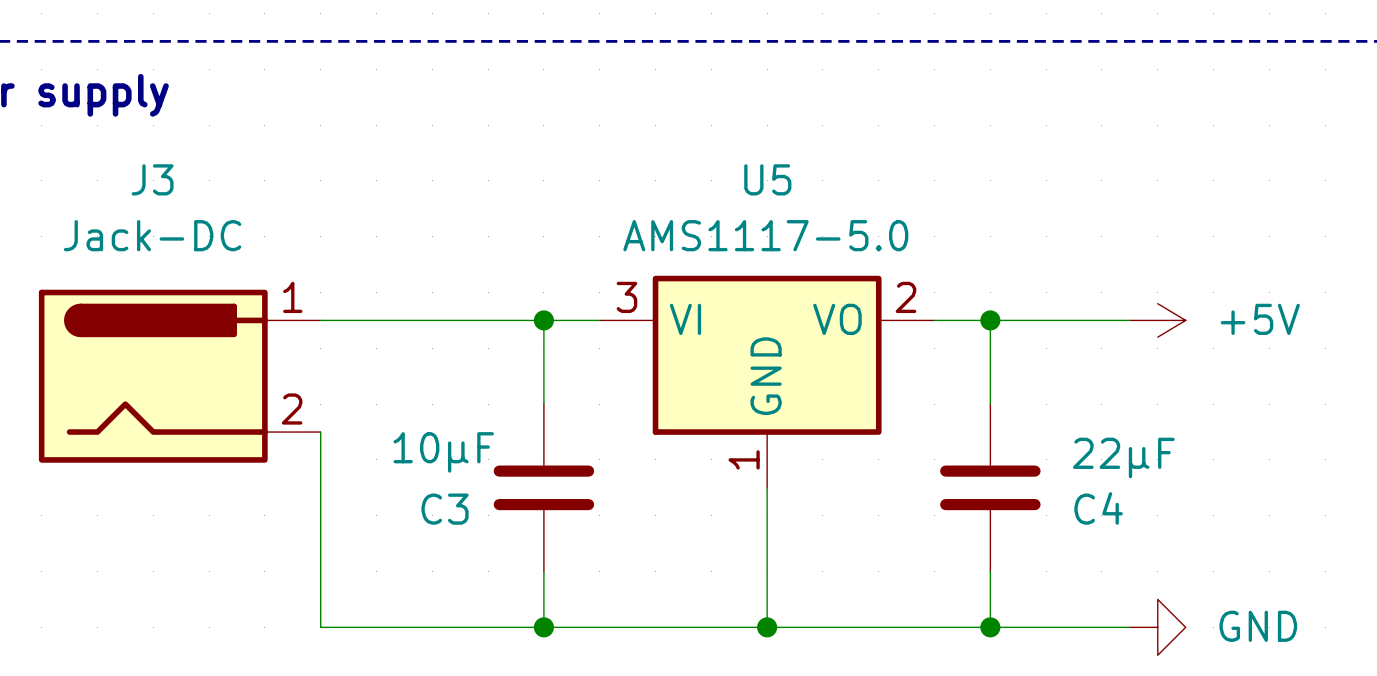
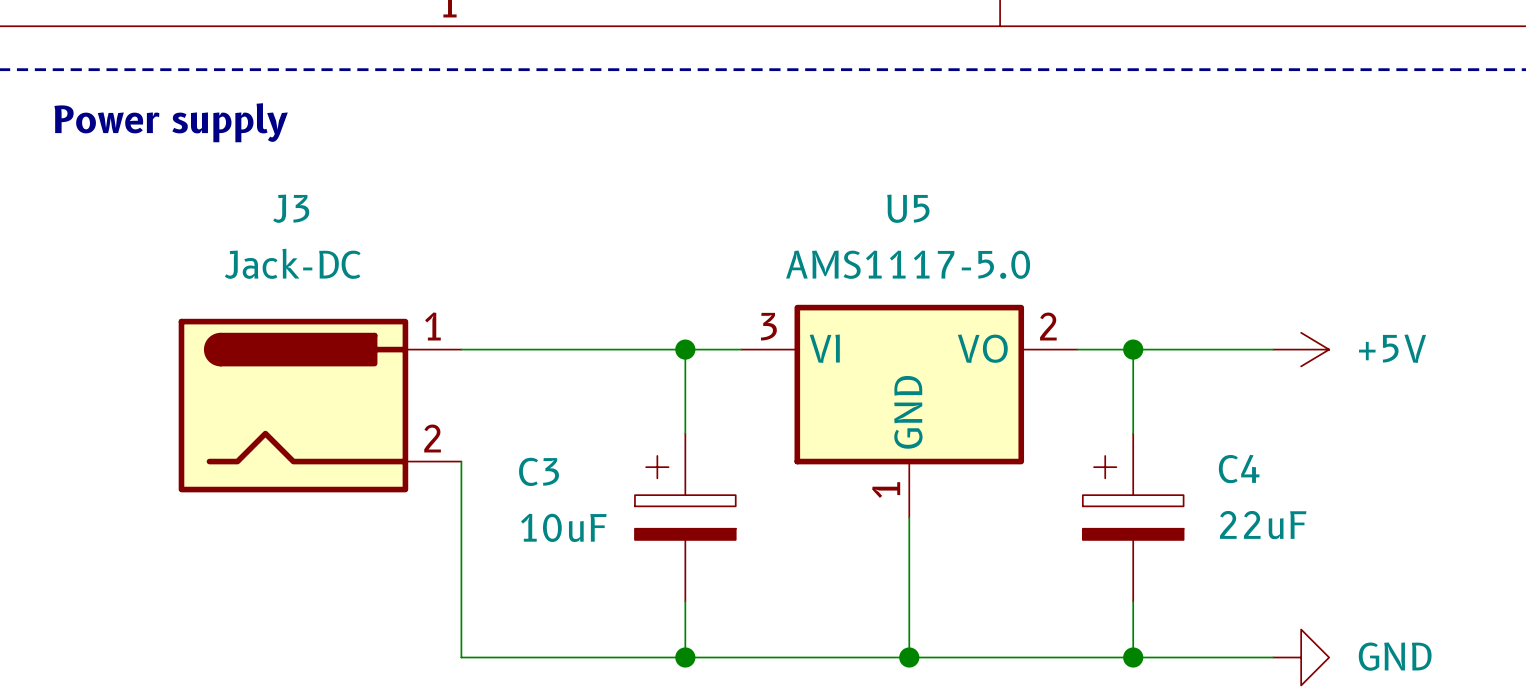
C3 symbol: [493, 404, 595, 572] -> [634, 433, 736, 602]
C4 symbol: [940, 404, 1041, 572] -> [1082, 433, 1184, 602]
C3 value: 10μF (443, 452) -> 10uF (563, 527)
C4 value: 22μF (1123, 457) -> 22uF (1263, 525)
C4 name position: C4 (1098, 508) -> C4 (1239, 469)
C3 name position: C3 (445, 509) -> C3 (539, 471)

